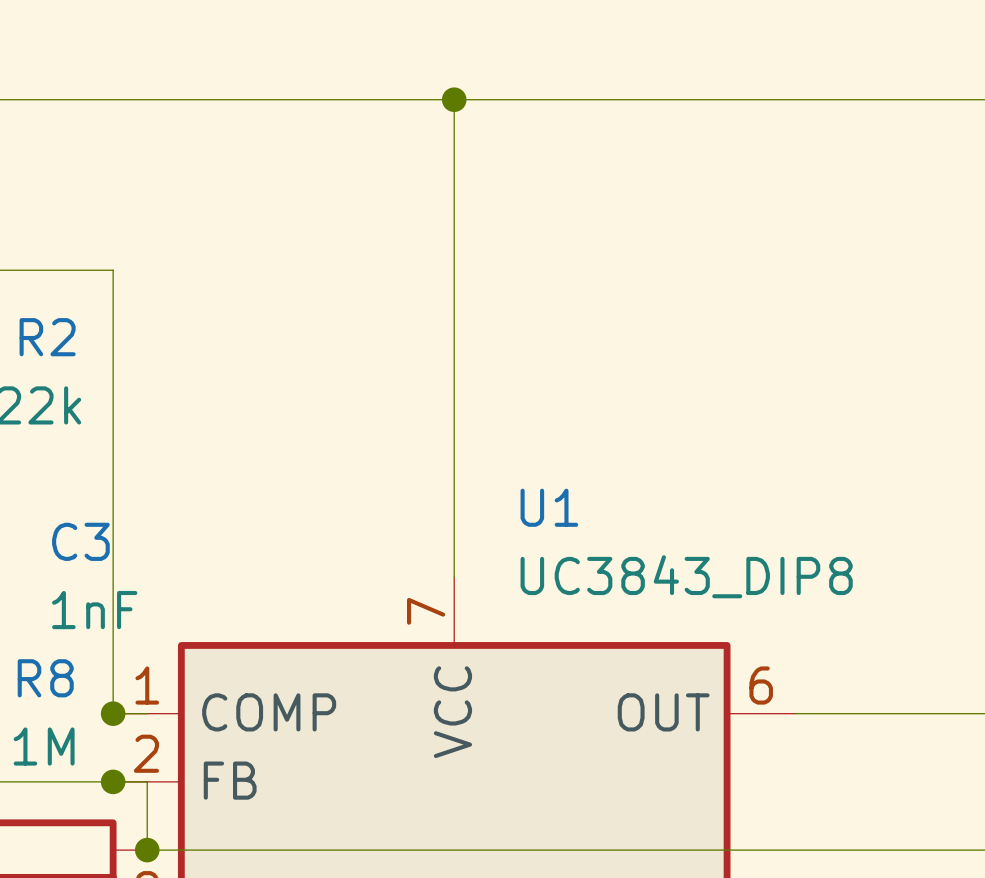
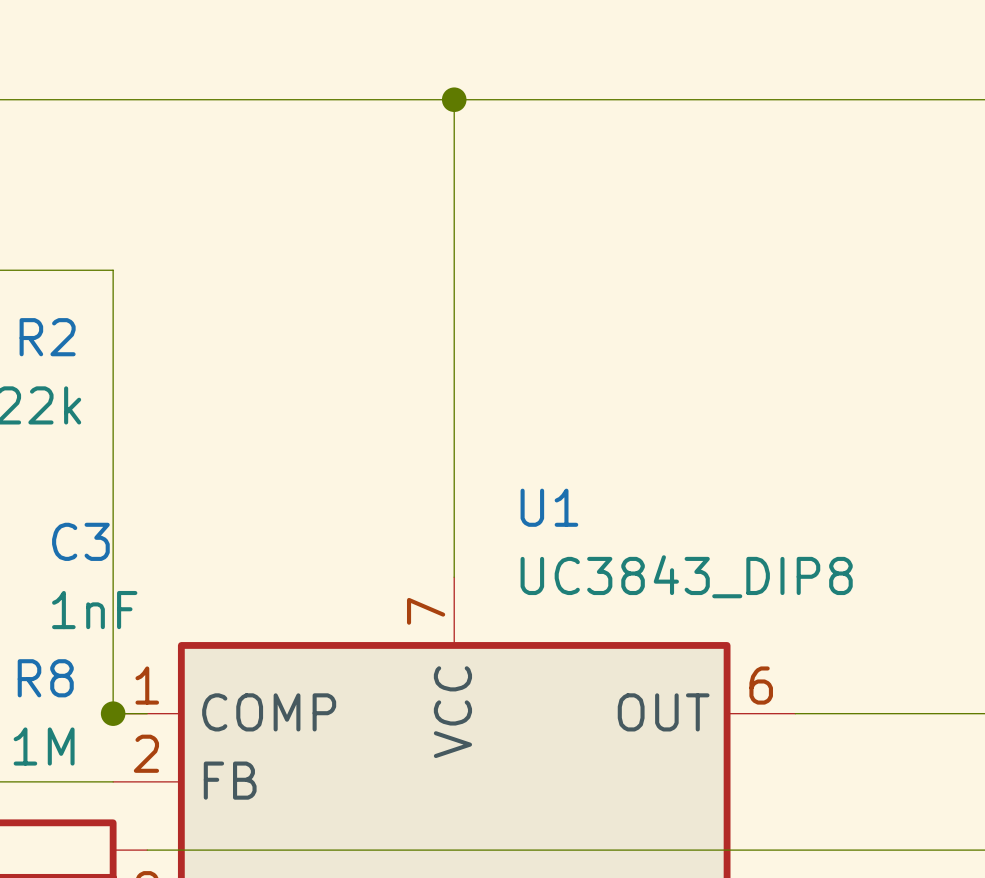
wire: (113, 781) (147, 781) (147, 850) -> none
junction: (113, 781) -> none
junction: (147, 850) -> none

